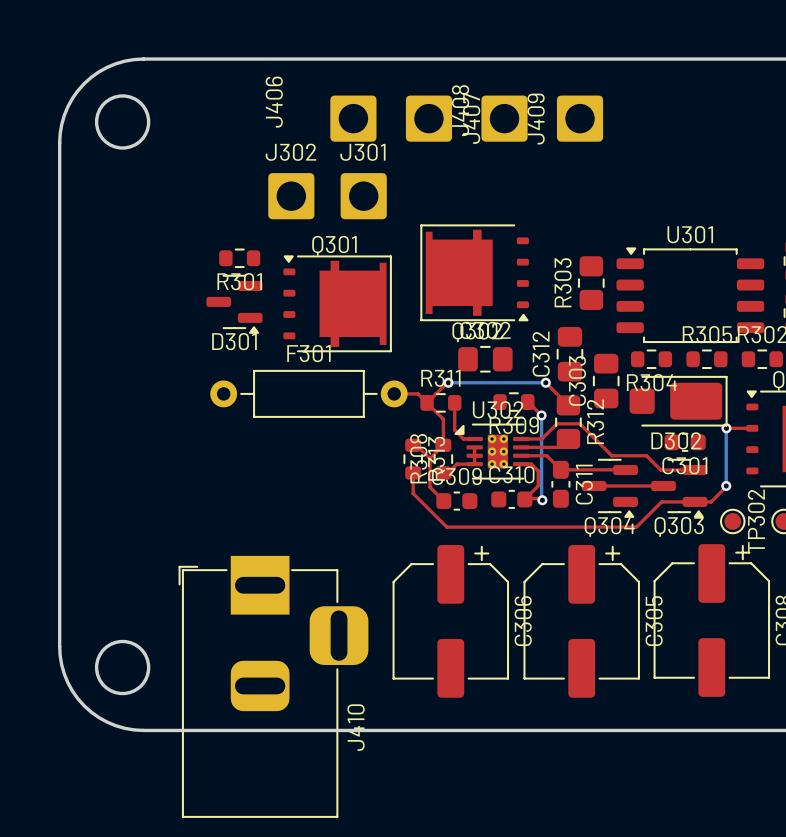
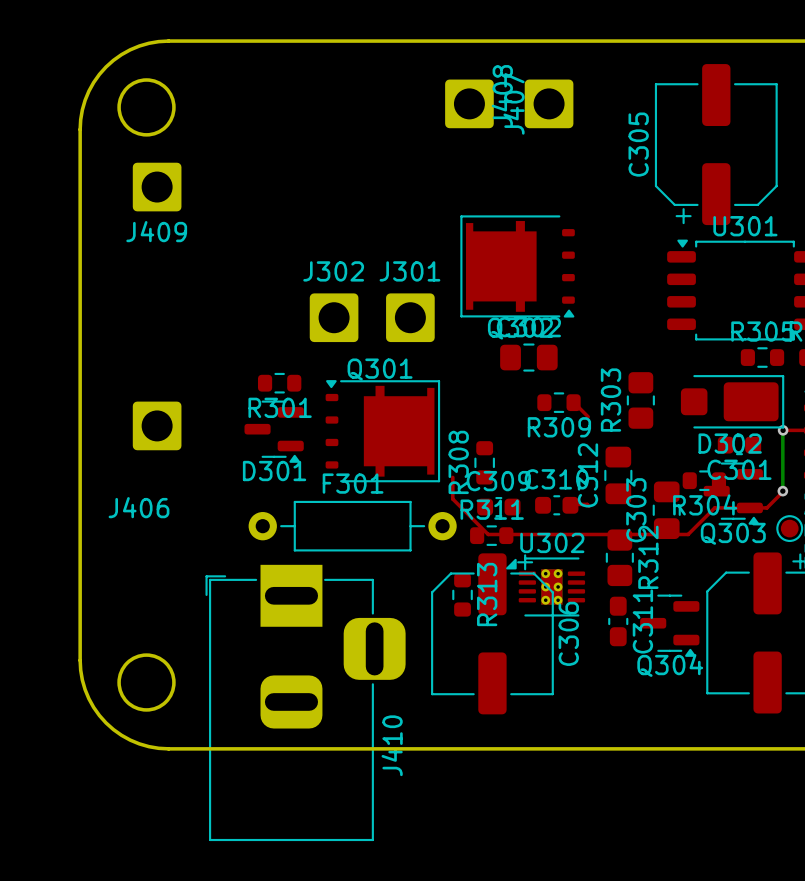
J406 name rotation: 0° (274, 102) -> 90° clockwise (139, 507)
J406 name position: J406 (274, 102) -> J406 (139, 507)
J406 position: (353, 118) -> (157, 425)
J409 position: (580, 118) -> (157, 187)
J409 name rotation: 0° (536, 119) -> 90° clockwise (156, 231)
J302 position: (291, 196) -> (334, 317)
J301 position: (363, 196) -> (410, 317)
R301 position: (239, 258) -> (279, 383)
R303 position: (591, 283) -> (640, 400)
Q301 position: (337, 303) -> (382, 431)
D301 position: (234, 304) -> (274, 431)
C312 position: (569, 354) -> (618, 475)
R304 position: (651, 359) -> (704, 480)
C303 position: (606, 381) -> (666, 510)
top track: (448, 382) (427, 402) -> none
bottom track: (448, 382) (545, 382) -> none
via: (448, 382) -> none
top track: (545, 382) (568, 405) -> none
via: (545, 382) -> none
F301 position: (308, 393) -> (352, 526)
top track: (394, 393) (418, 393) (443, 419) (443, 445) (429, 458) -> none
R311 position: (440, 402) -> (491, 535)
top track: (454, 402) (454, 430) (463, 438) (474, 438) -> none
bottom track: (541, 415) (542, 500) -> none
via: (541, 415) -> none
R312 position: (568, 422) -> (619, 557)
top track: (521, 438) (541, 438) (556, 423) (579, 423) (611, 455) (646, 455) (660, 470) (694, 470) -> none
top track: (568, 438) (560, 447) (521, 447) -> none
top track: (413, 445) (416, 445) (429, 458) -> none
top track: (474, 447) (474, 464) (456, 464) (448, 472) (443, 472) -> none
U302 position: (491, 451) -> (545, 586)
top track: (521, 455) (546, 455) (560, 469) (625, 469) -> none
top track: (429, 458) (429, 487) (443, 501) -> none
R313 position: (413, 459) -> (462, 594)
top track: (521, 464) (531, 464) (538, 470) (538, 485) (524, 499) -> none
C311 position: (560, 484) -> (618, 621)
top track: (594, 485) (663, 485) -> none
Q304 position: (609, 488) -> (669, 625)
via: (542, 500) -> none
C305 footprint: [523, 544, 640, 698] -> [654, 64, 778, 226]
C305 name position: C305 (654, 621) -> C305 (638, 144)

